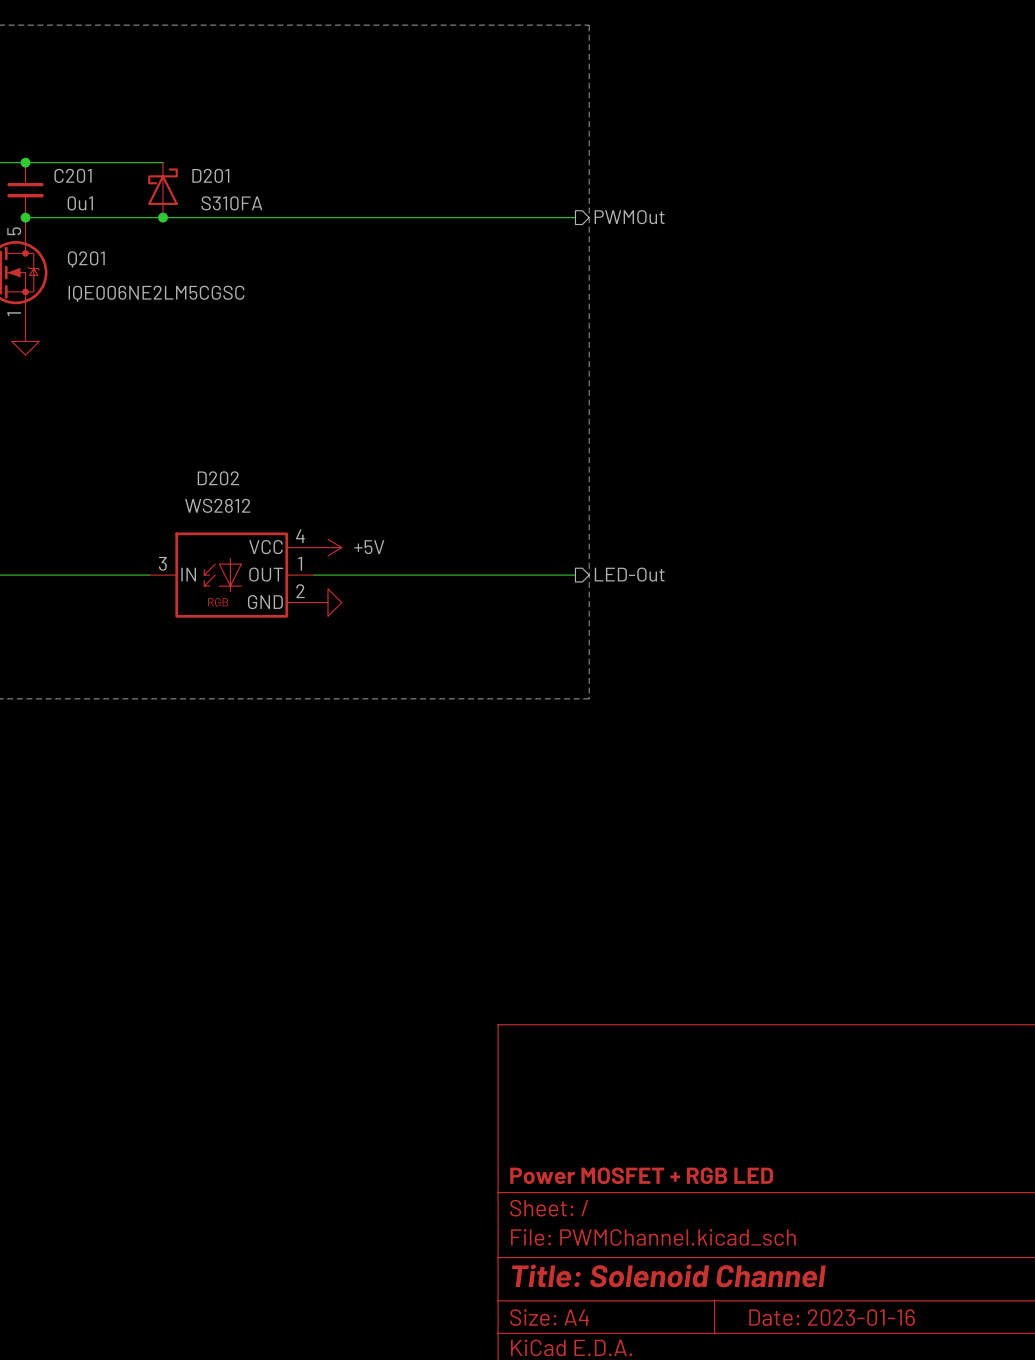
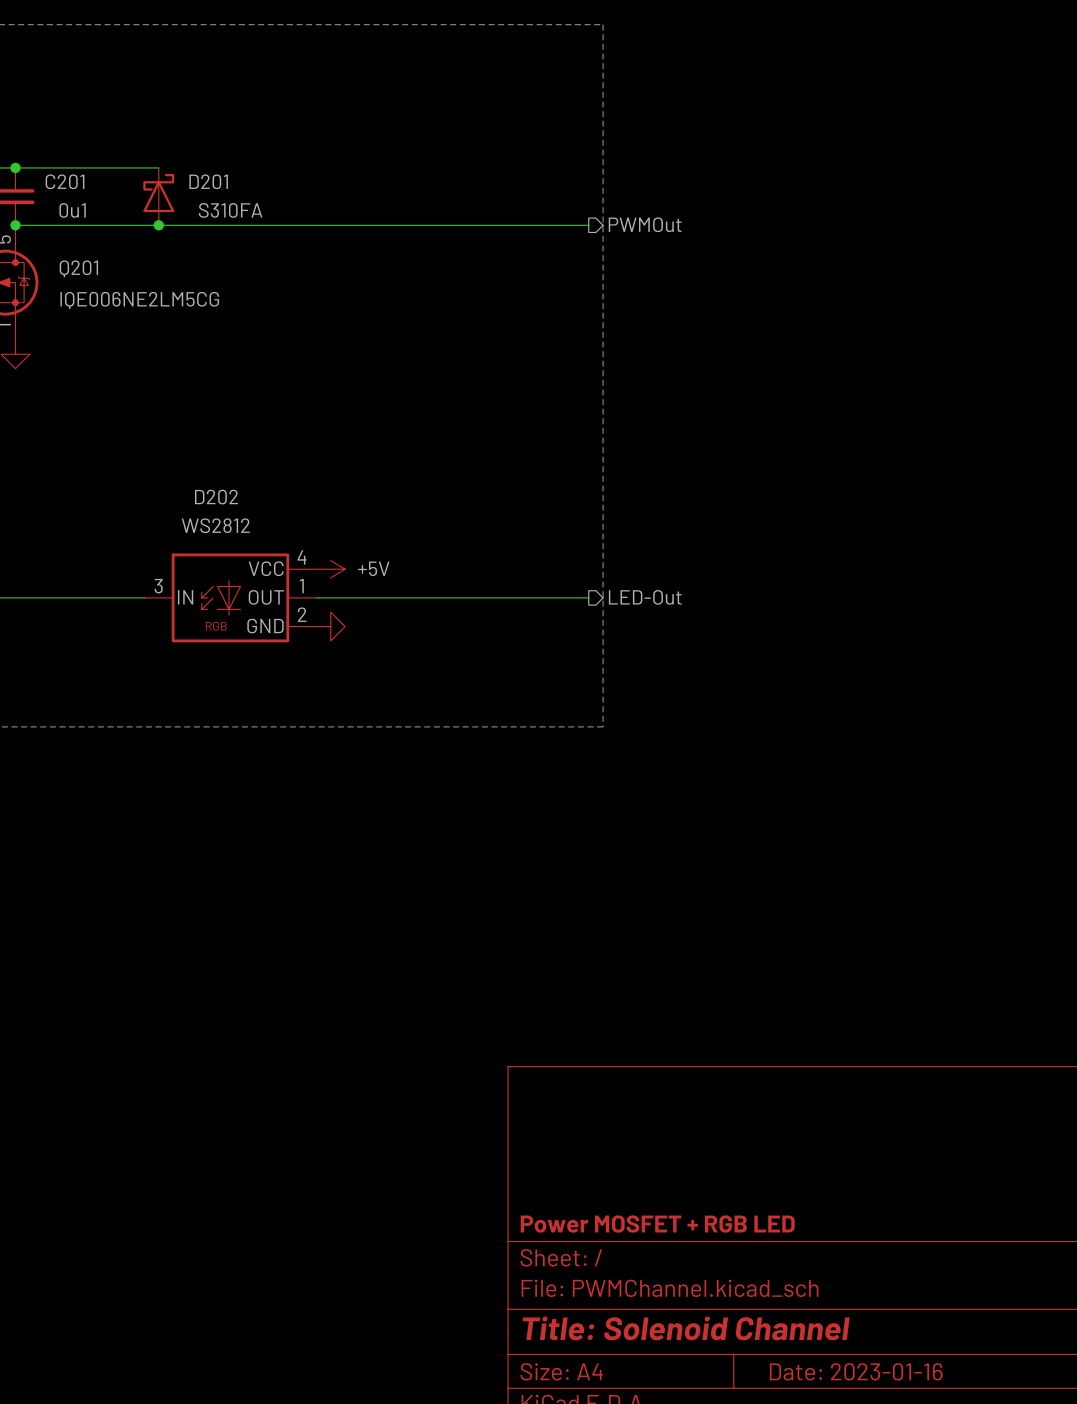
Q201 value: IQE006NE2LM5CGSC (156, 293) -> IQE006NE2LM5CG (139, 300)

